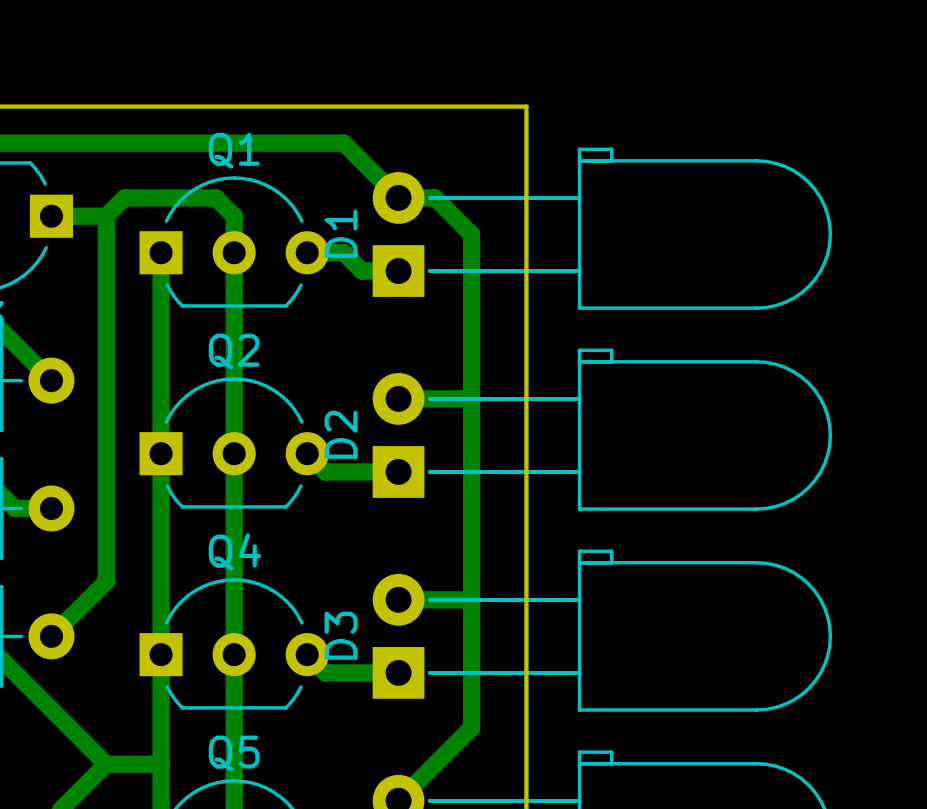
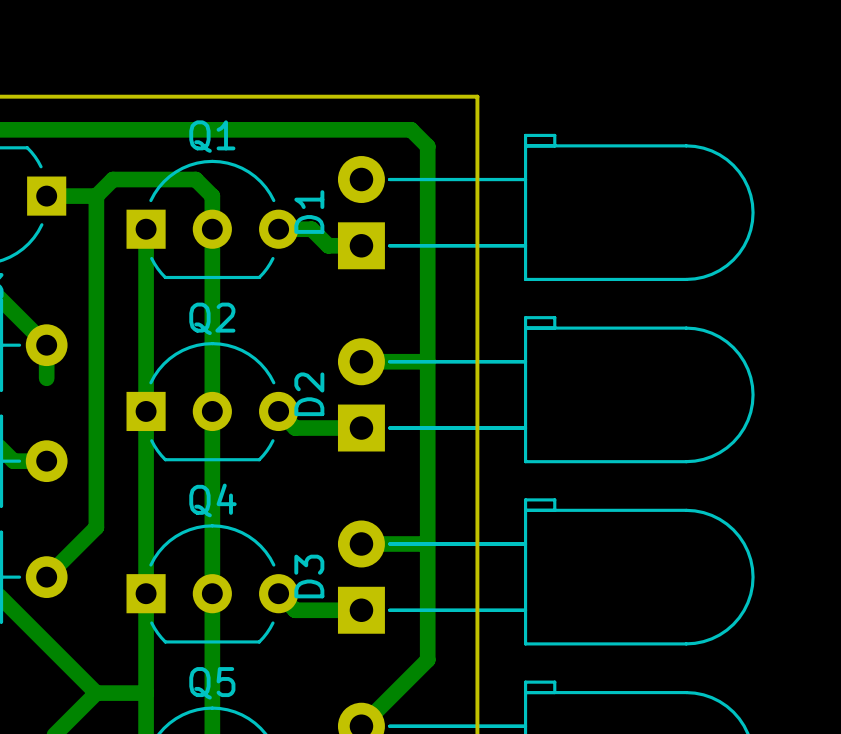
bottom track: (343, 143) (398, 197) (435, 197) (471, 234) -> (311, 129) (411, 129) (427, 146) (427, 212)
bottom track: none -> (46, 345) (46, 378)

